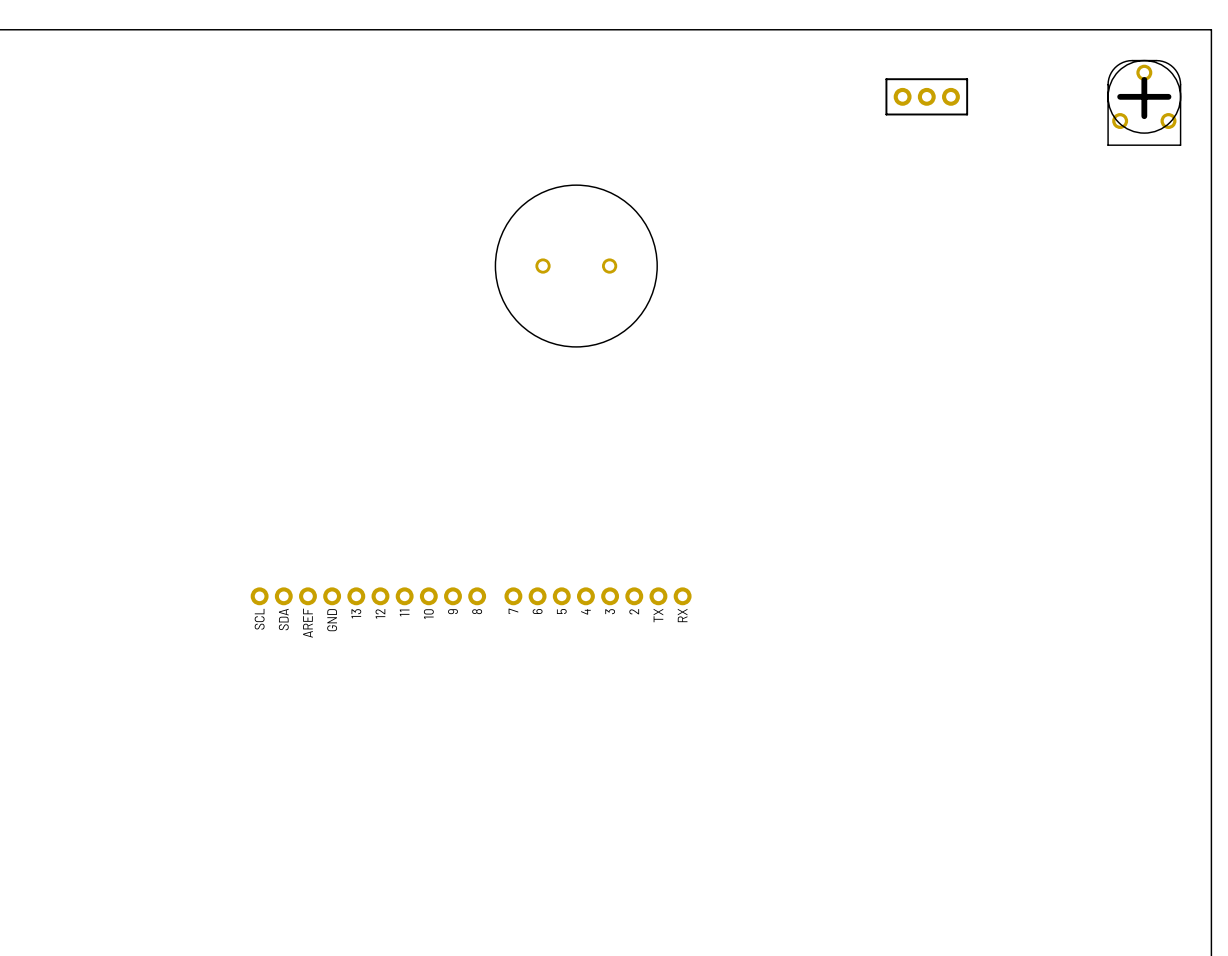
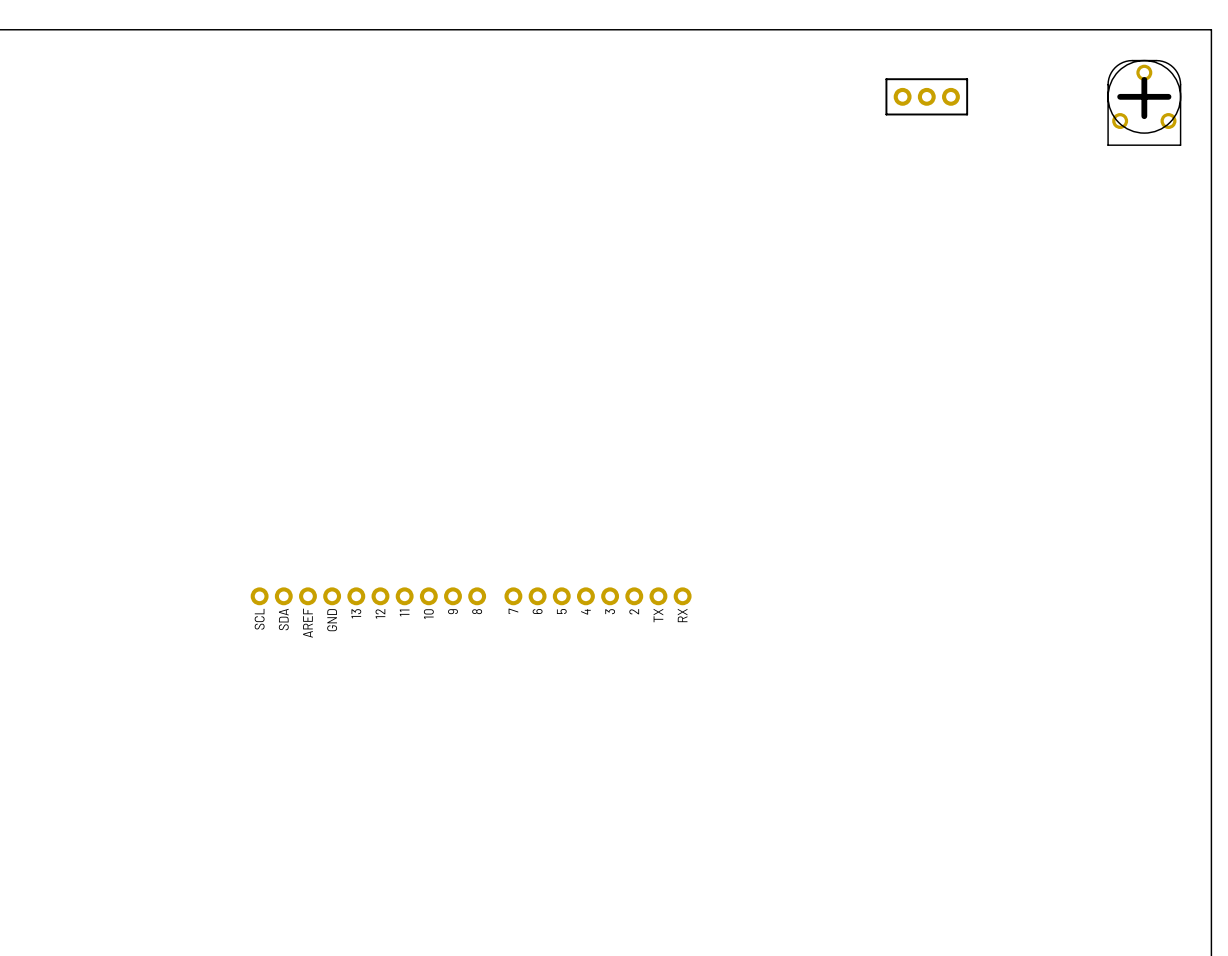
part: (576, 266) -> none

